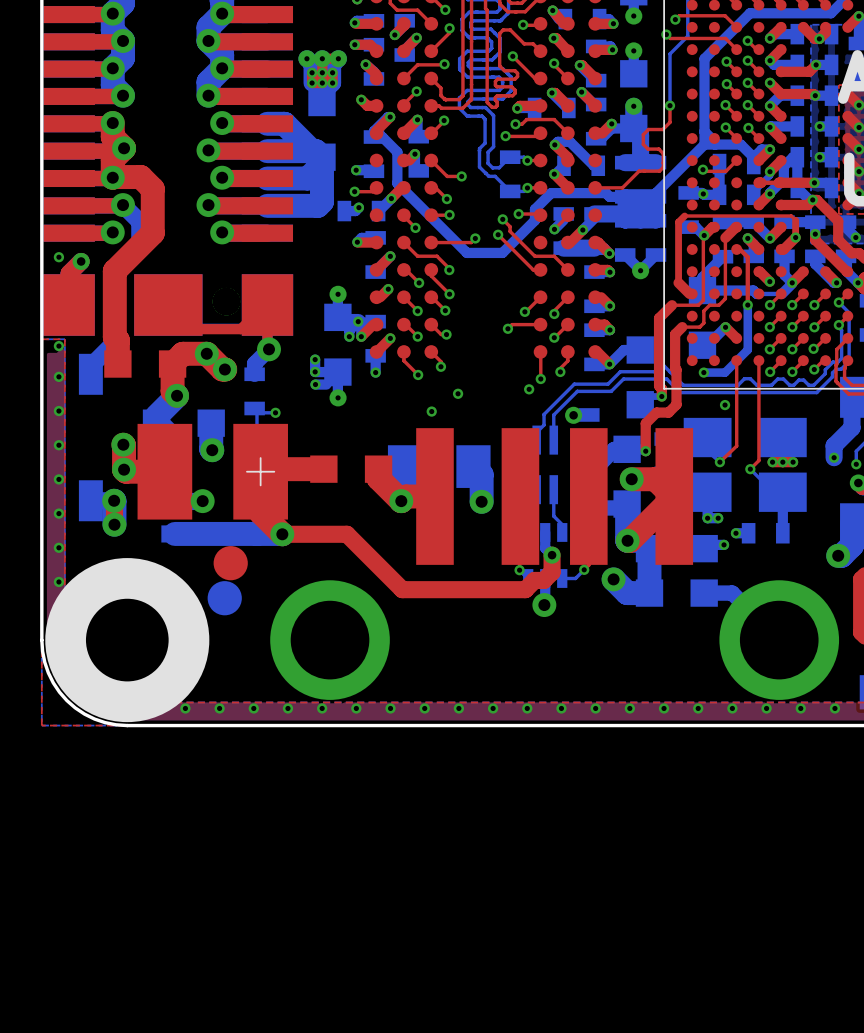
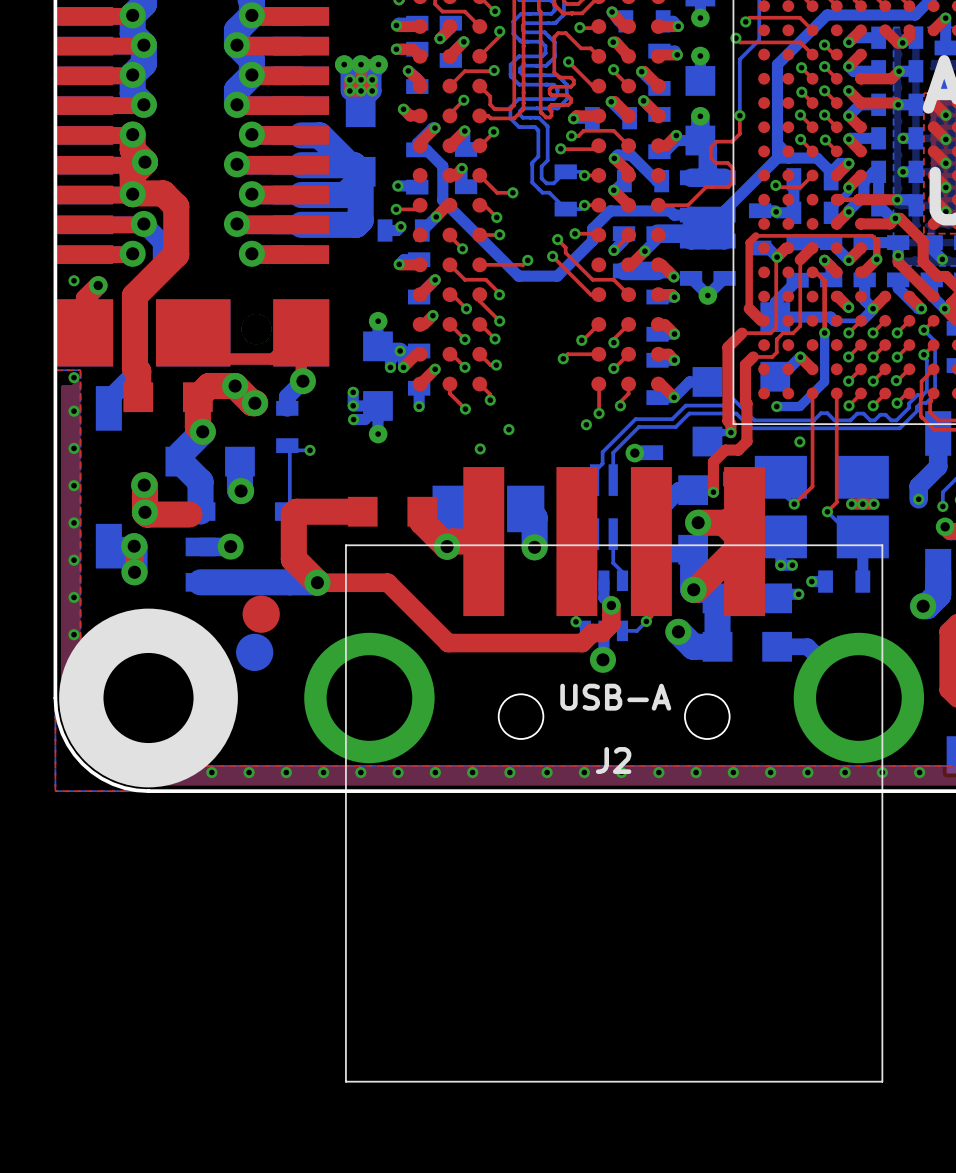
part: (212, 471) -> none
part: (554, 564) -> none
J2: none -> USB-A (614, 774)

